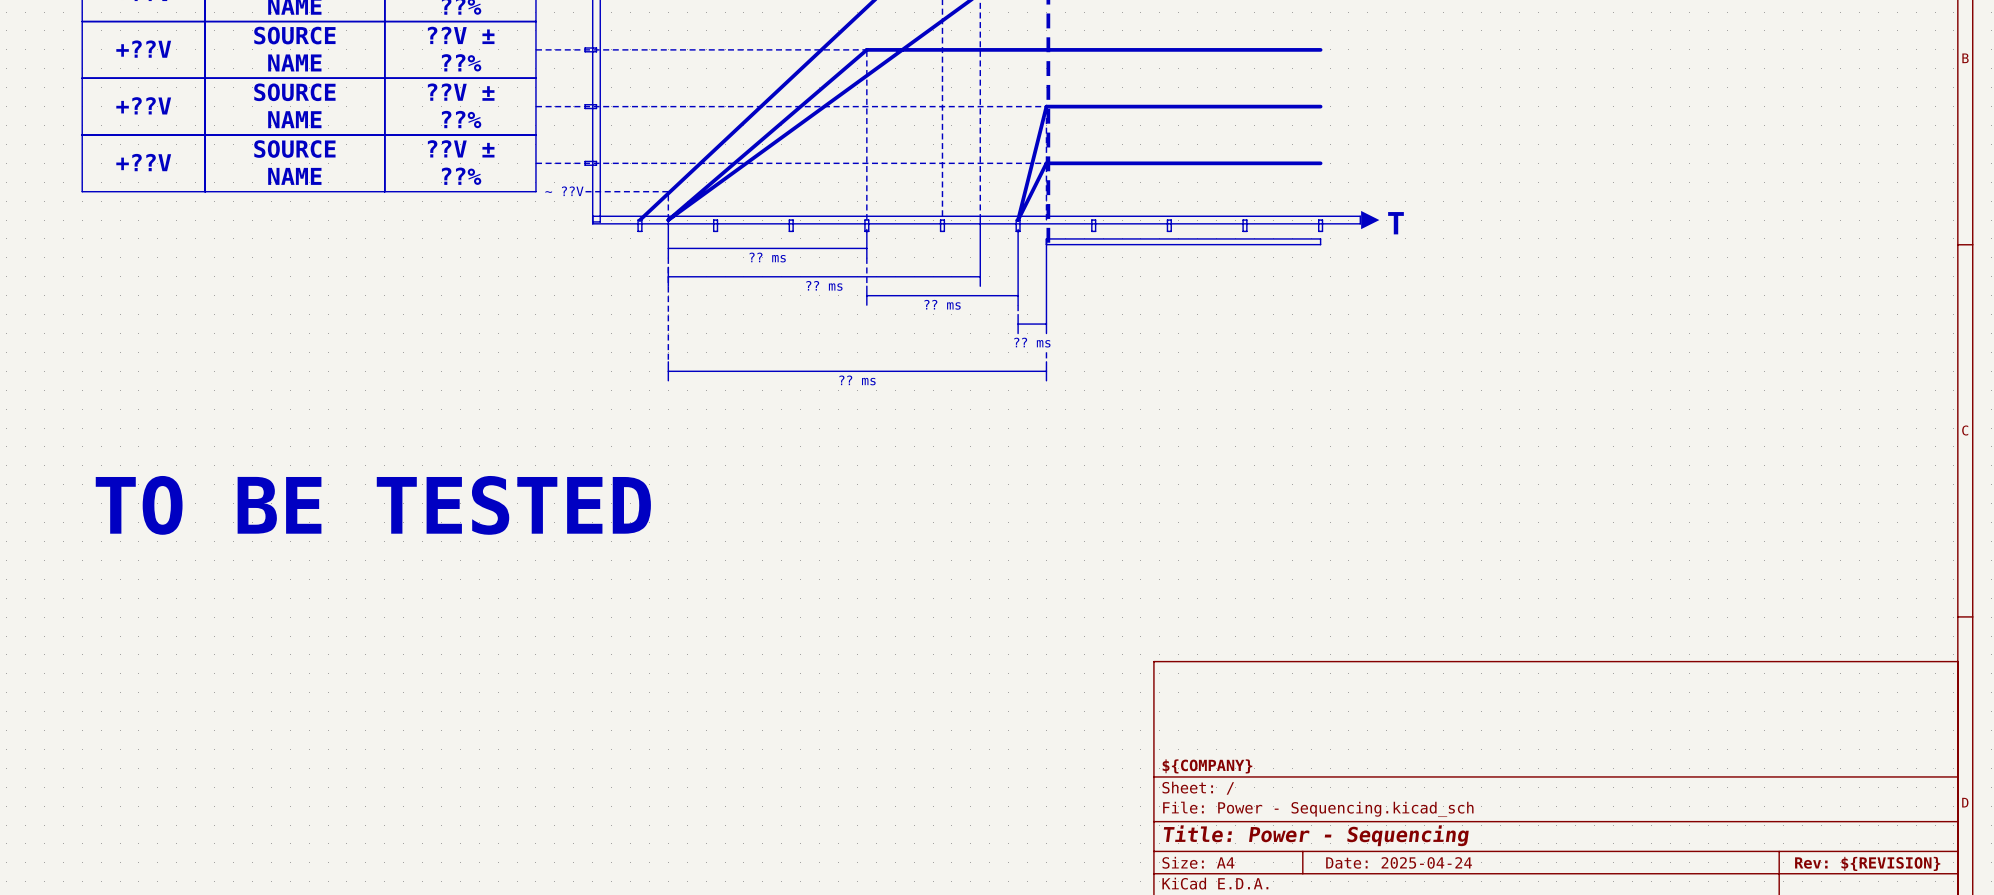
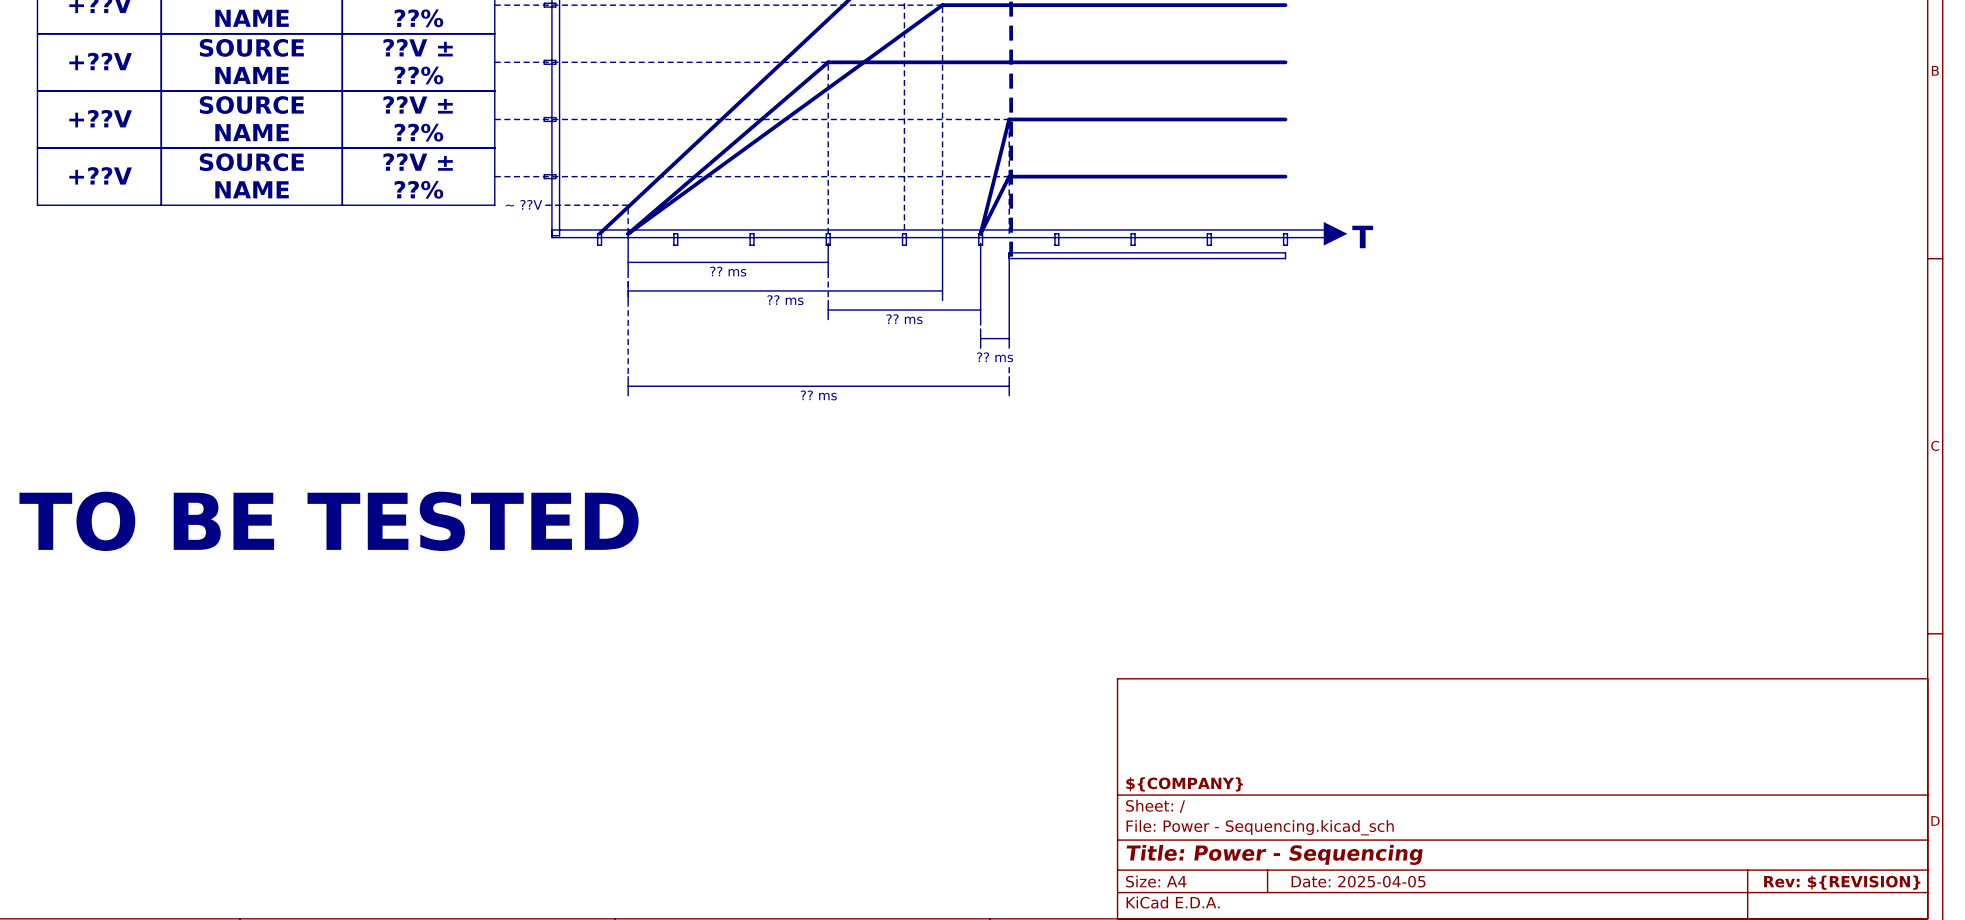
title block: Date: 2025-04-24 (1399, 862) -> Date: 2025-04-05 (1358, 881)

